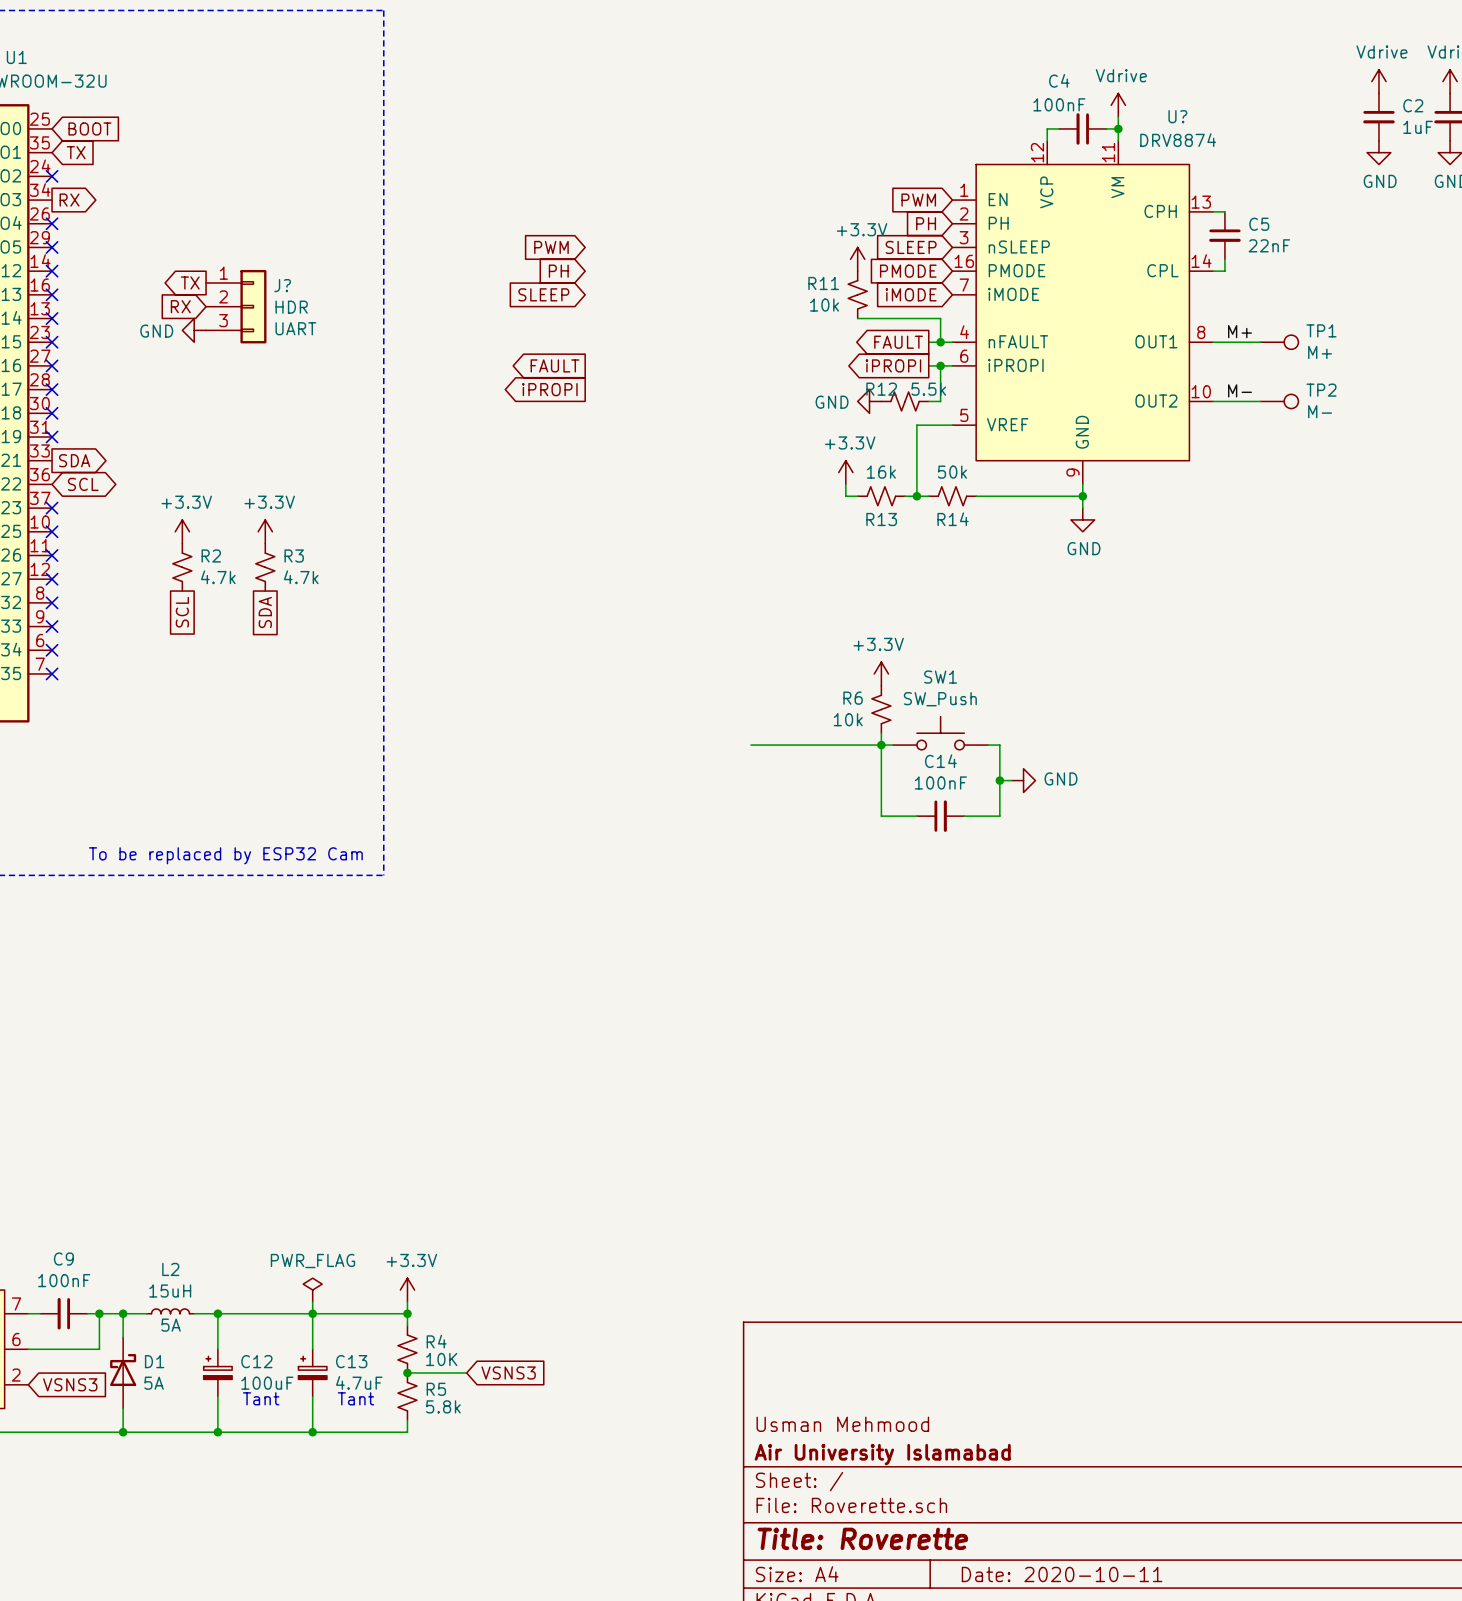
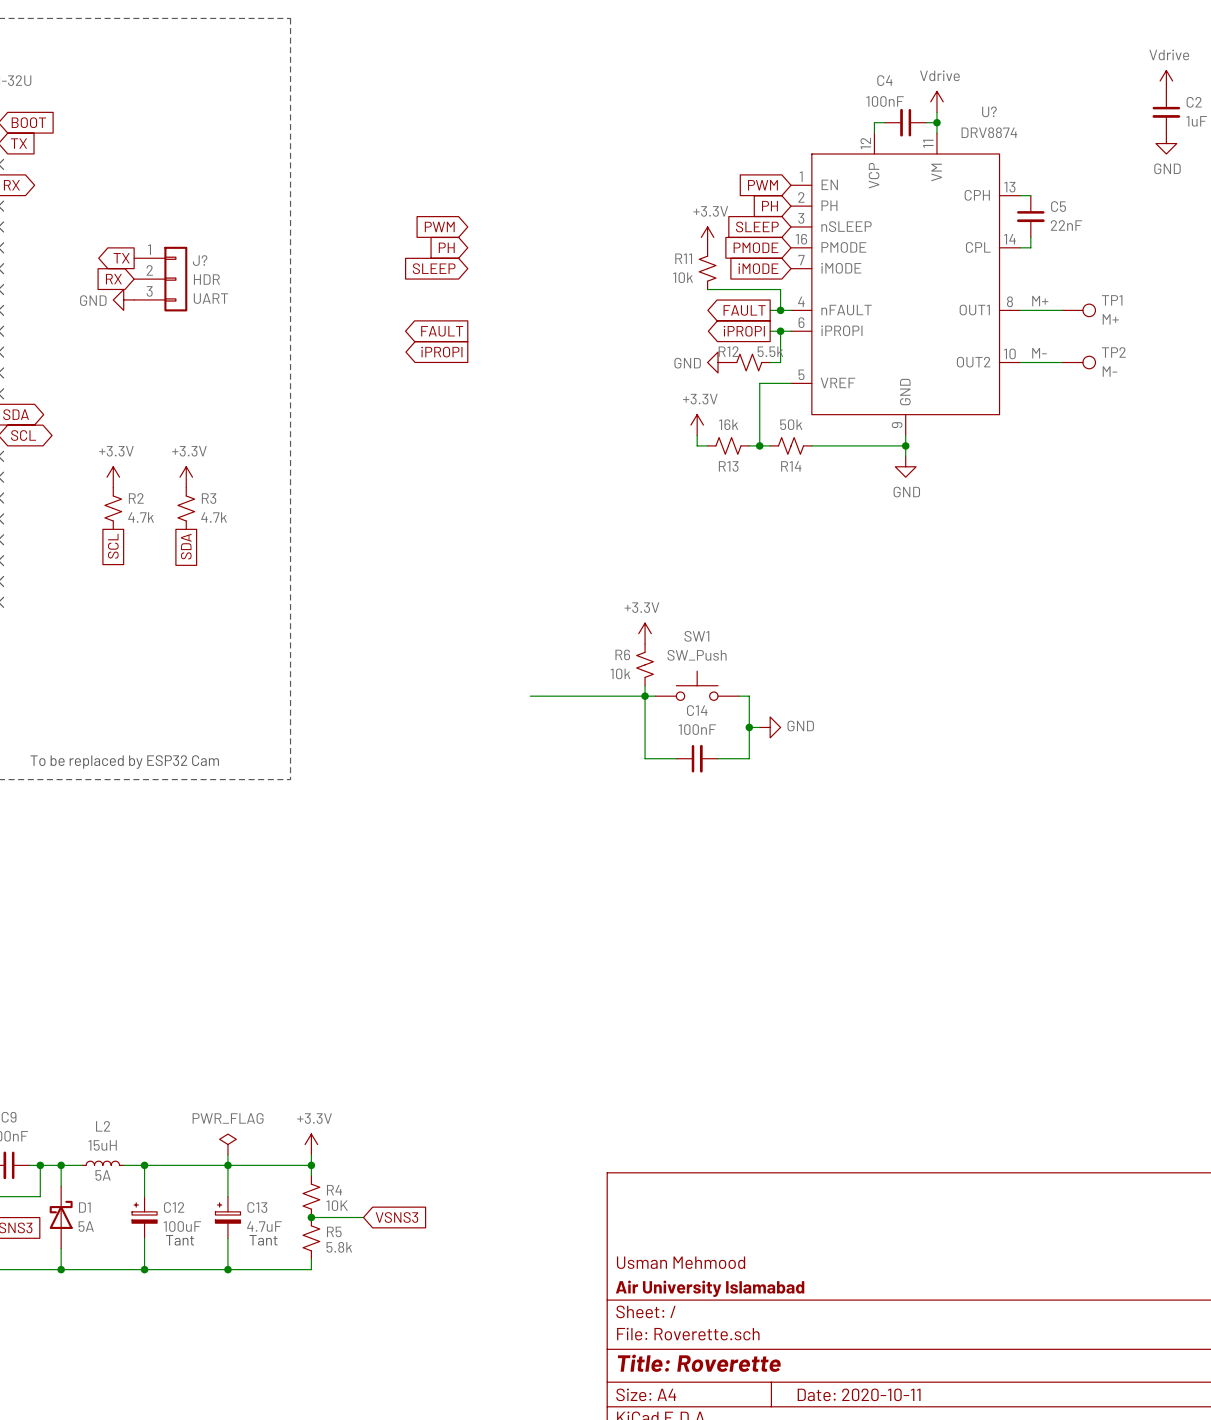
power symbol position: +3.3V (881, 673) -> +3.3V (645, 633)
R6 position: (881, 709) -> (645, 664)
wire: (881, 733) (881, 816) (905, 816) -> none
SW1 position: (940, 733) -> (697, 685)
wire: (751, 745) (893, 745) -> (530, 696) (655, 696)
junction: (881, 745) -> none
wire: (988, 745) (999, 745) (999, 816) (964, 816) -> (738, 696) (749, 696) (749, 758) (718, 758)
wire: none -> (645, 685) (645, 758) (676, 758)
junction: none -> (645, 696)
wire: (999, 780) (1011, 780) -> none
junction: (999, 780) -> none
power symbol position: GND (1023, 780) -> GND (770, 727)
junction: none -> (749, 727)
C14 position: (940, 816) -> (697, 758)

